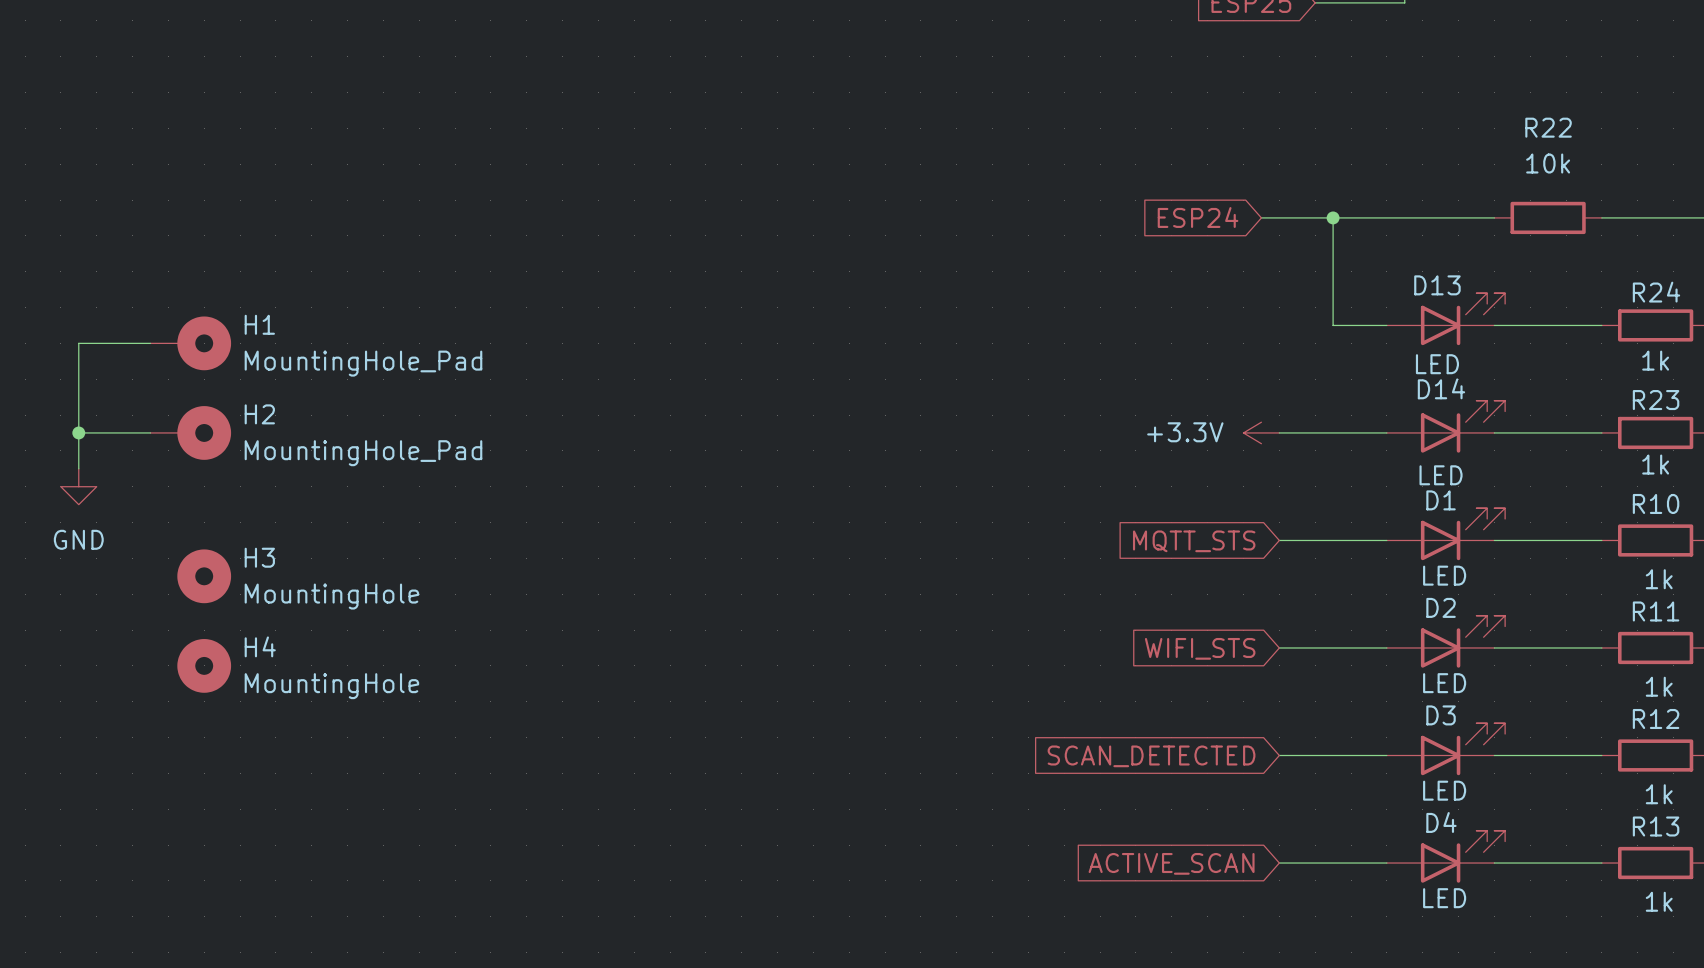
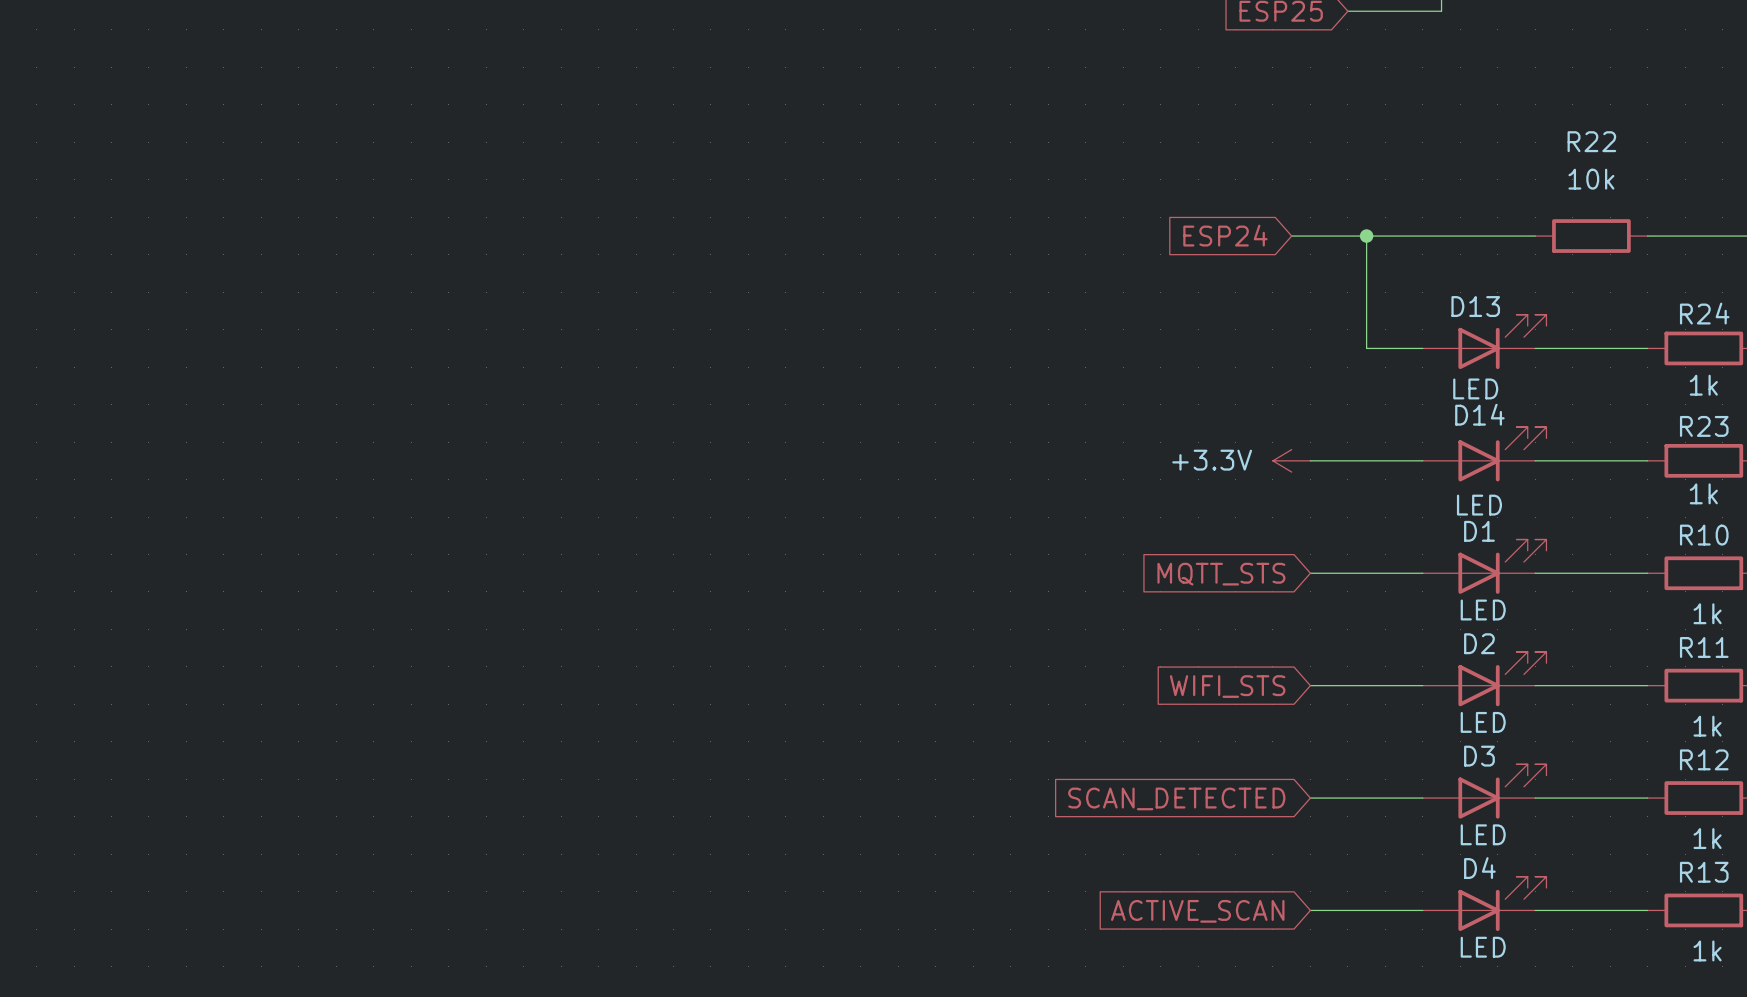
wire: (150, 343) (78, 343) (78, 468) -> none
H1: MountingHole_Pad (190, 343) -> none
wire: (78, 432) (150, 432) -> none
junction: (78, 432) -> none
H2: MountingHole_Pad (190, 432) -> none
power symbol: GND (78, 486) -> none
H3: MountingHole (204, 576) -> none
H4: MountingHole (204, 665) -> none

